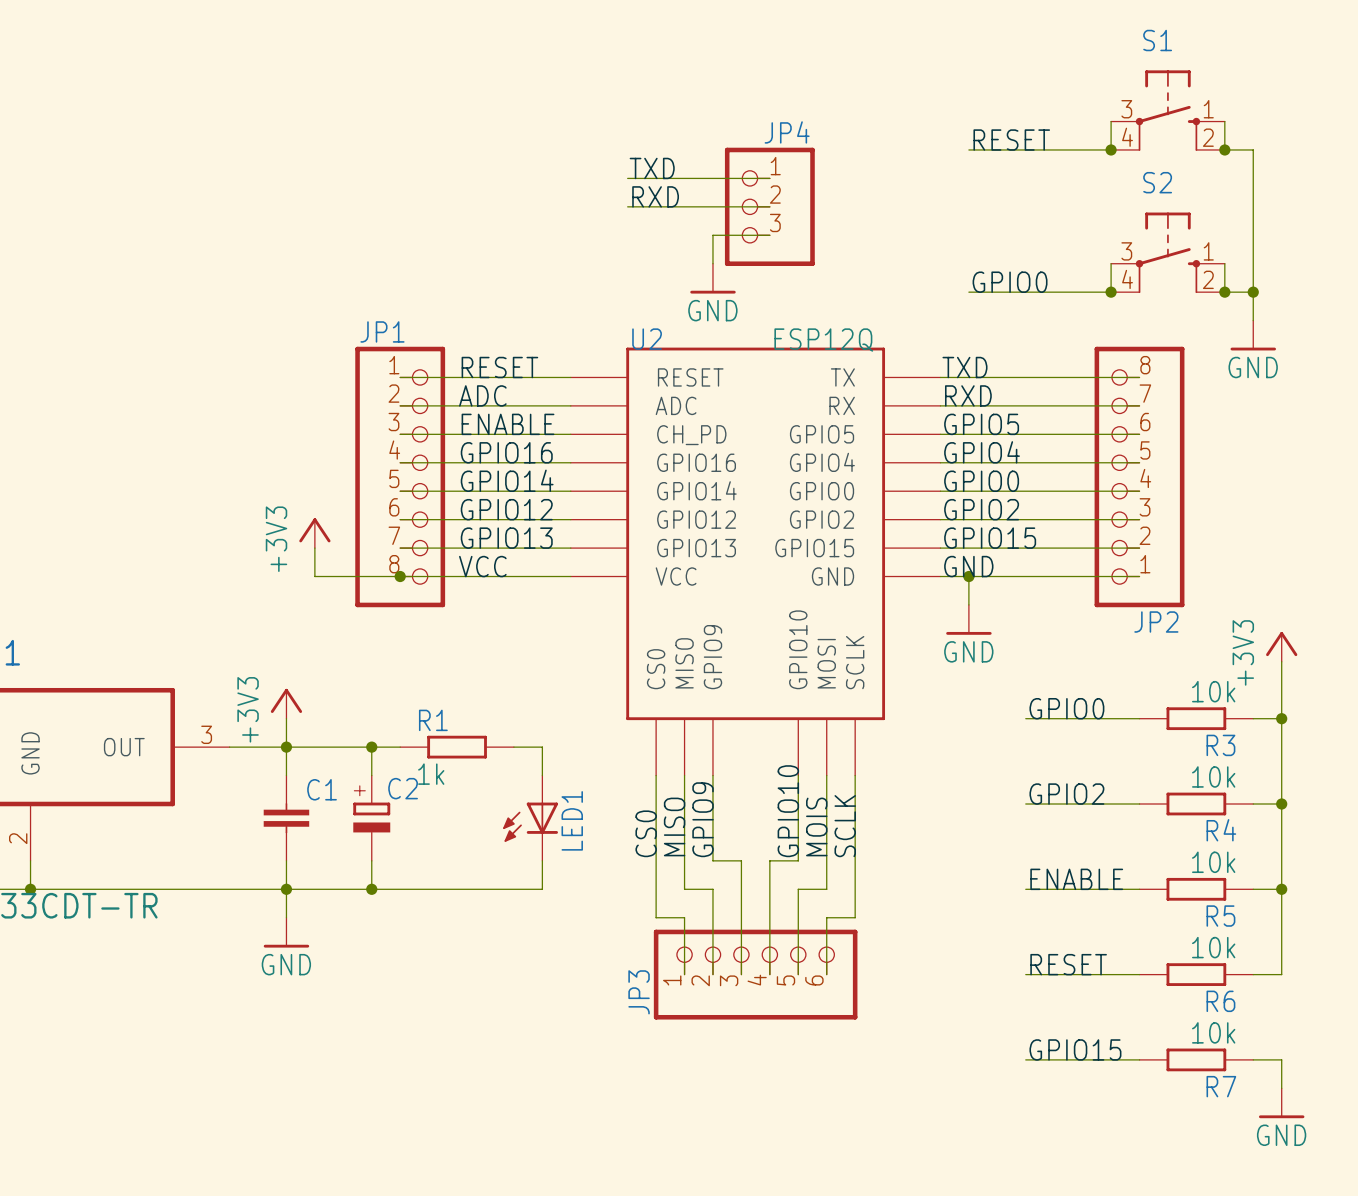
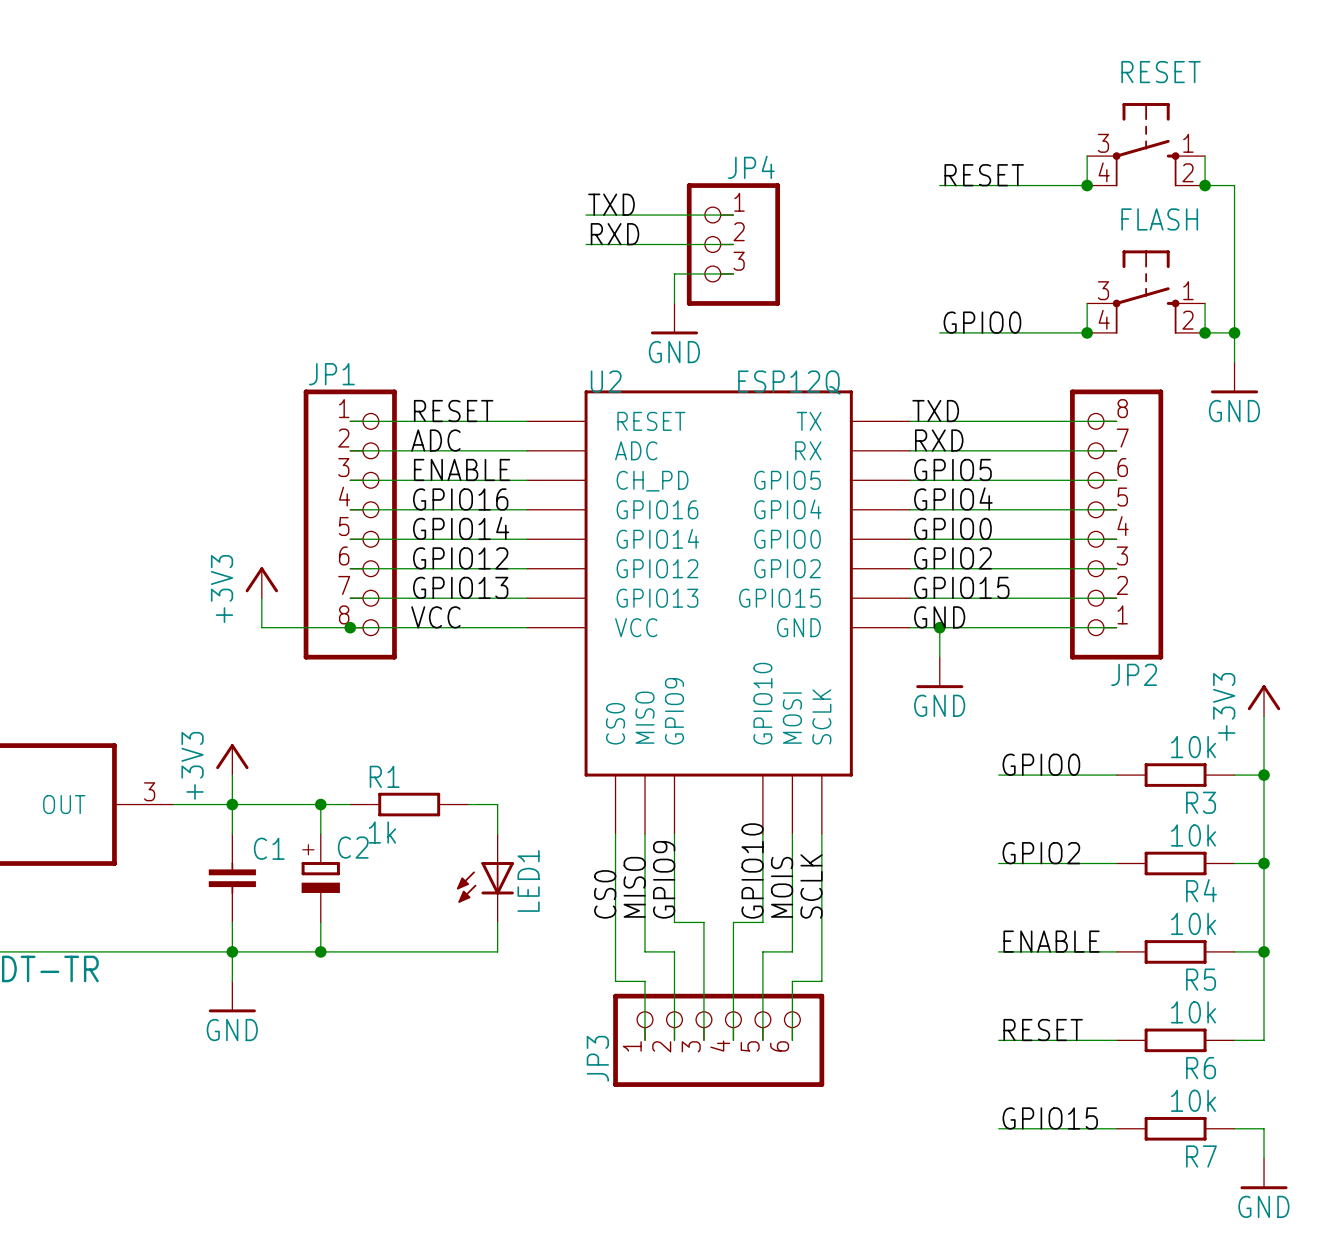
S1 name: S1 (1157, 40) -> RESET (1161, 72)
S2 name: S2 (1157, 182) -> FLASH (1159, 219)

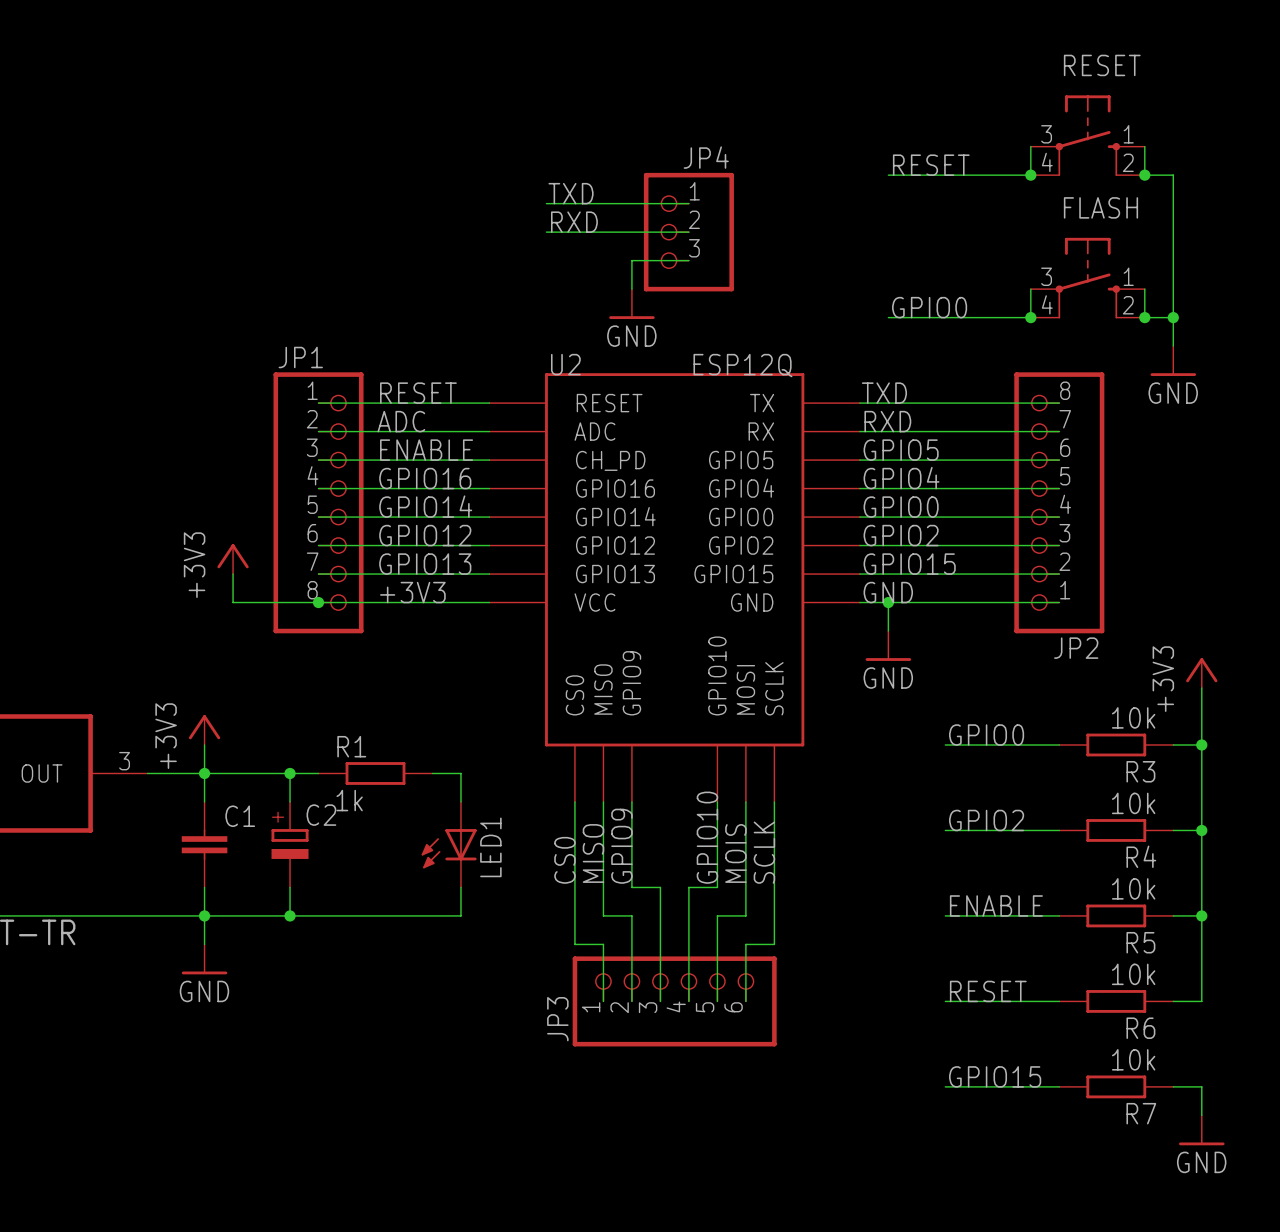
label: VCC (435, 617) -> +3V3 (412, 592)

